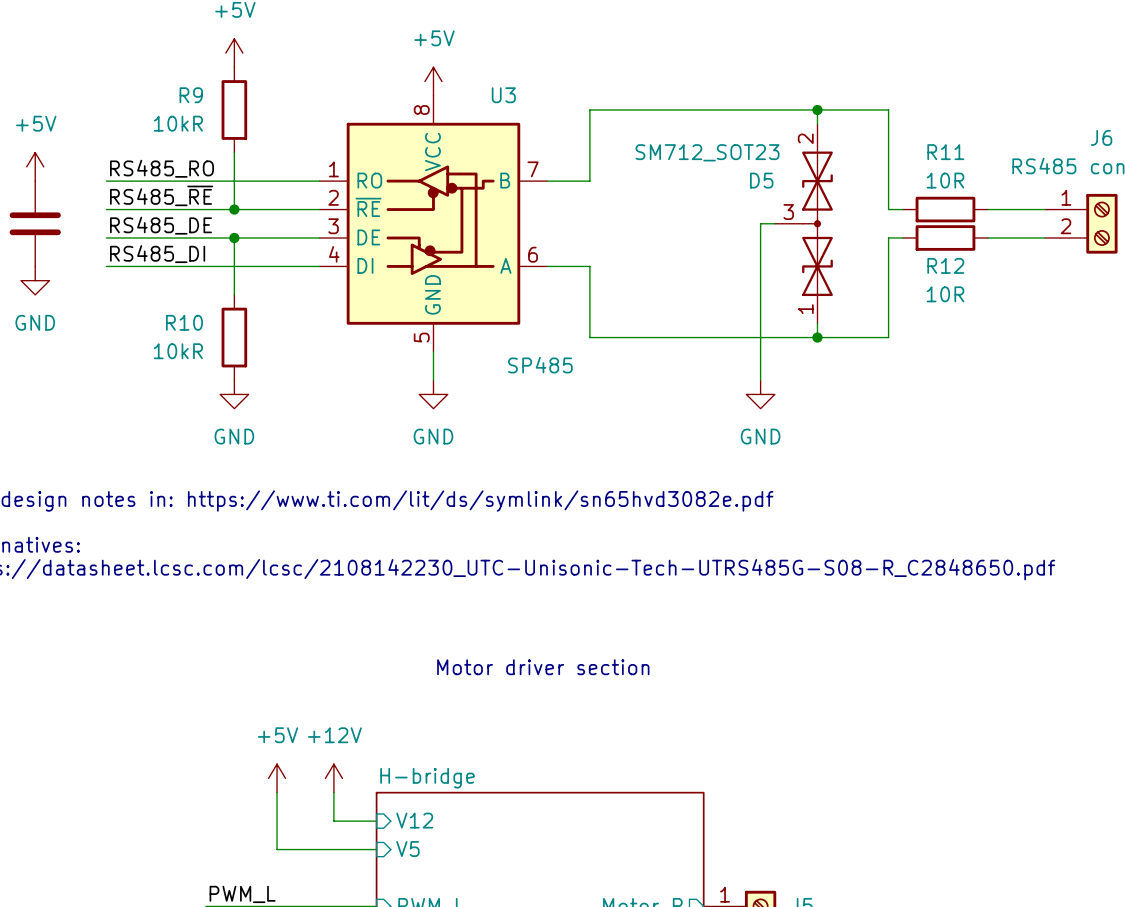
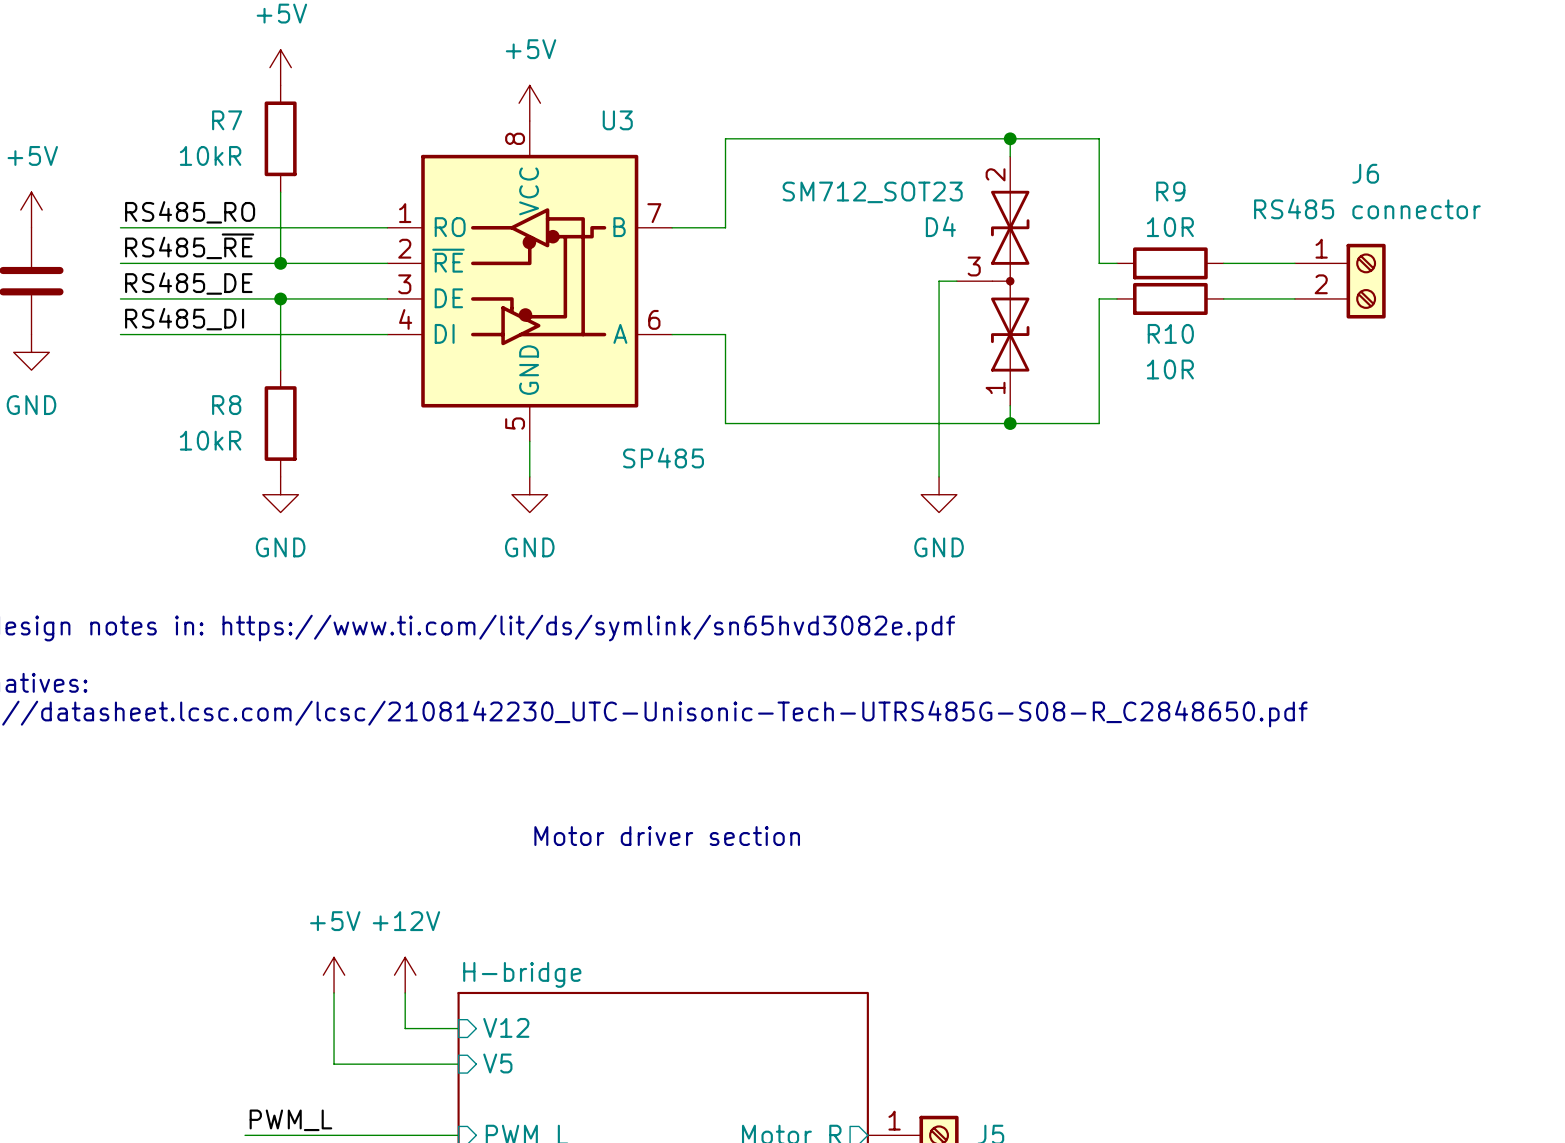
R9 name: R9 (191, 95) -> R7 (227, 120)
R11 name: R11 (945, 152) -> R9 (1170, 191)
D5 name: D5 (761, 180) -> D4 (940, 226)
R12 name: R12 (945, 265) -> R10 (1170, 333)
R10 name: R10 (184, 322) -> R8 (226, 405)

